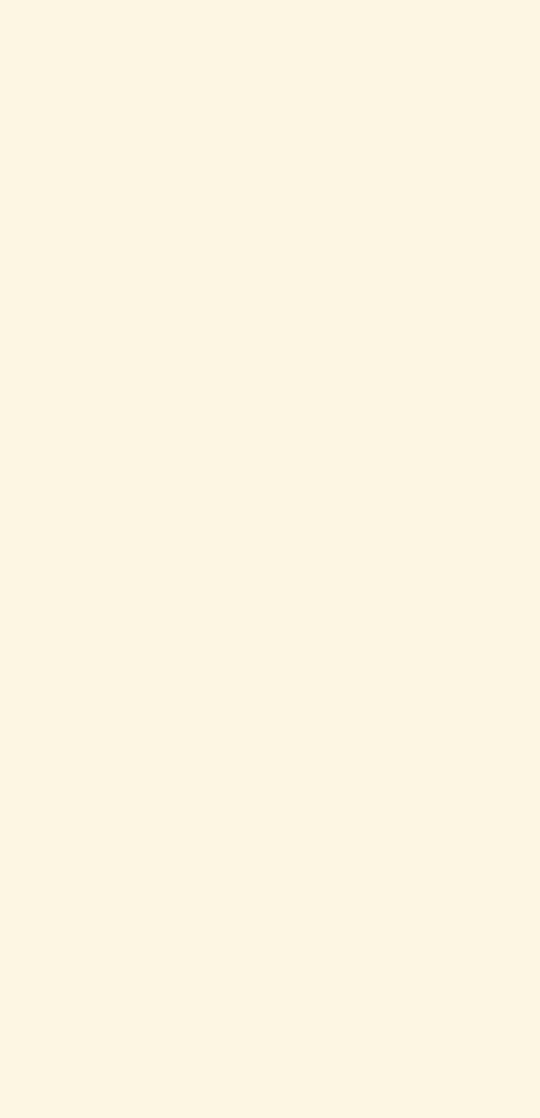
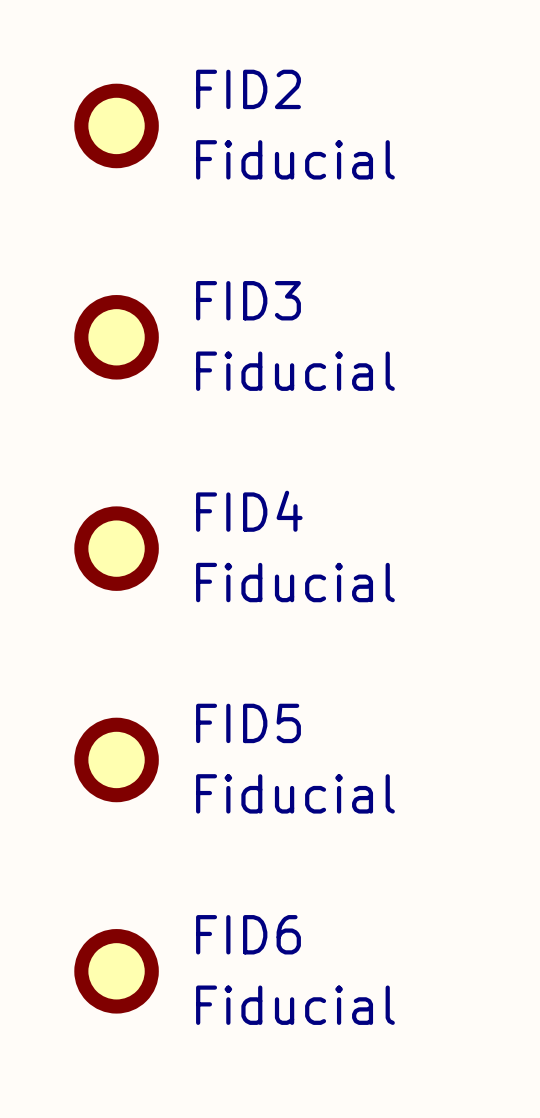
FID2: none -> Fiducial (116, 125)
FID3: none -> Fiducial (116, 337)
FID4: none -> Fiducial (116, 548)
FID5: none -> Fiducial (116, 759)
FID6: none -> Fiducial (116, 971)

